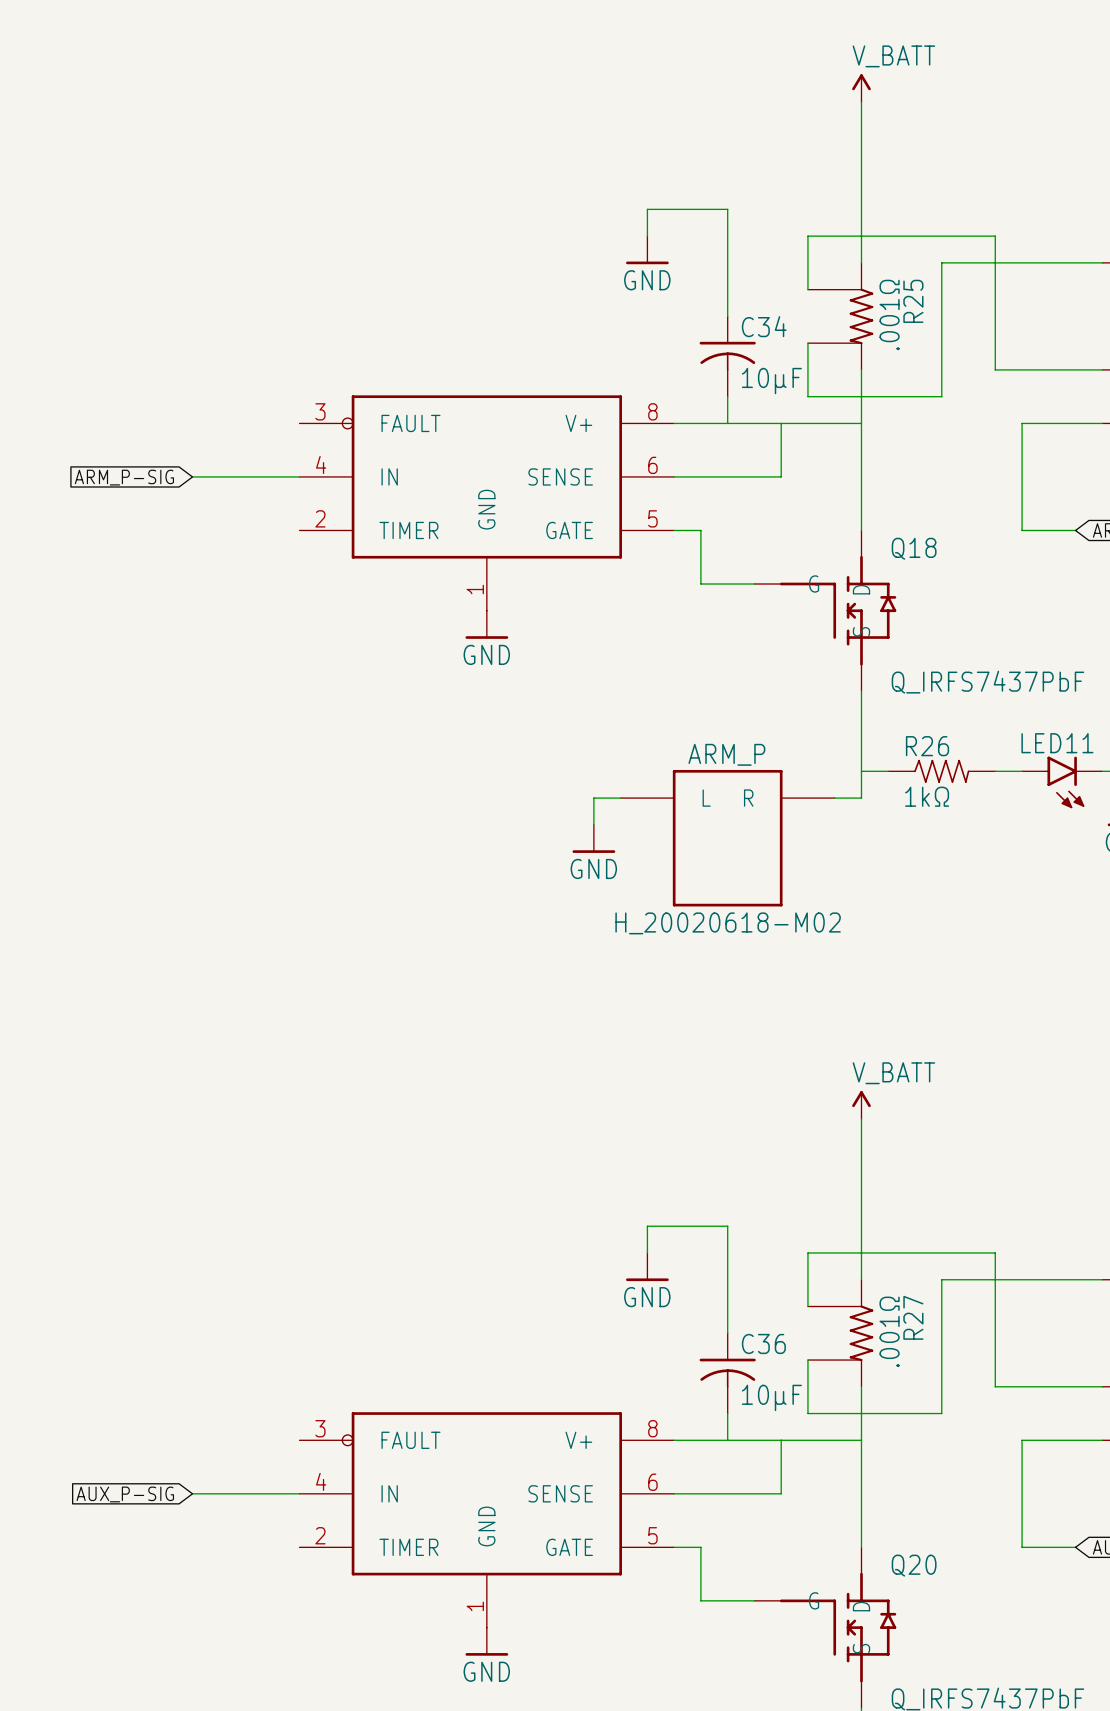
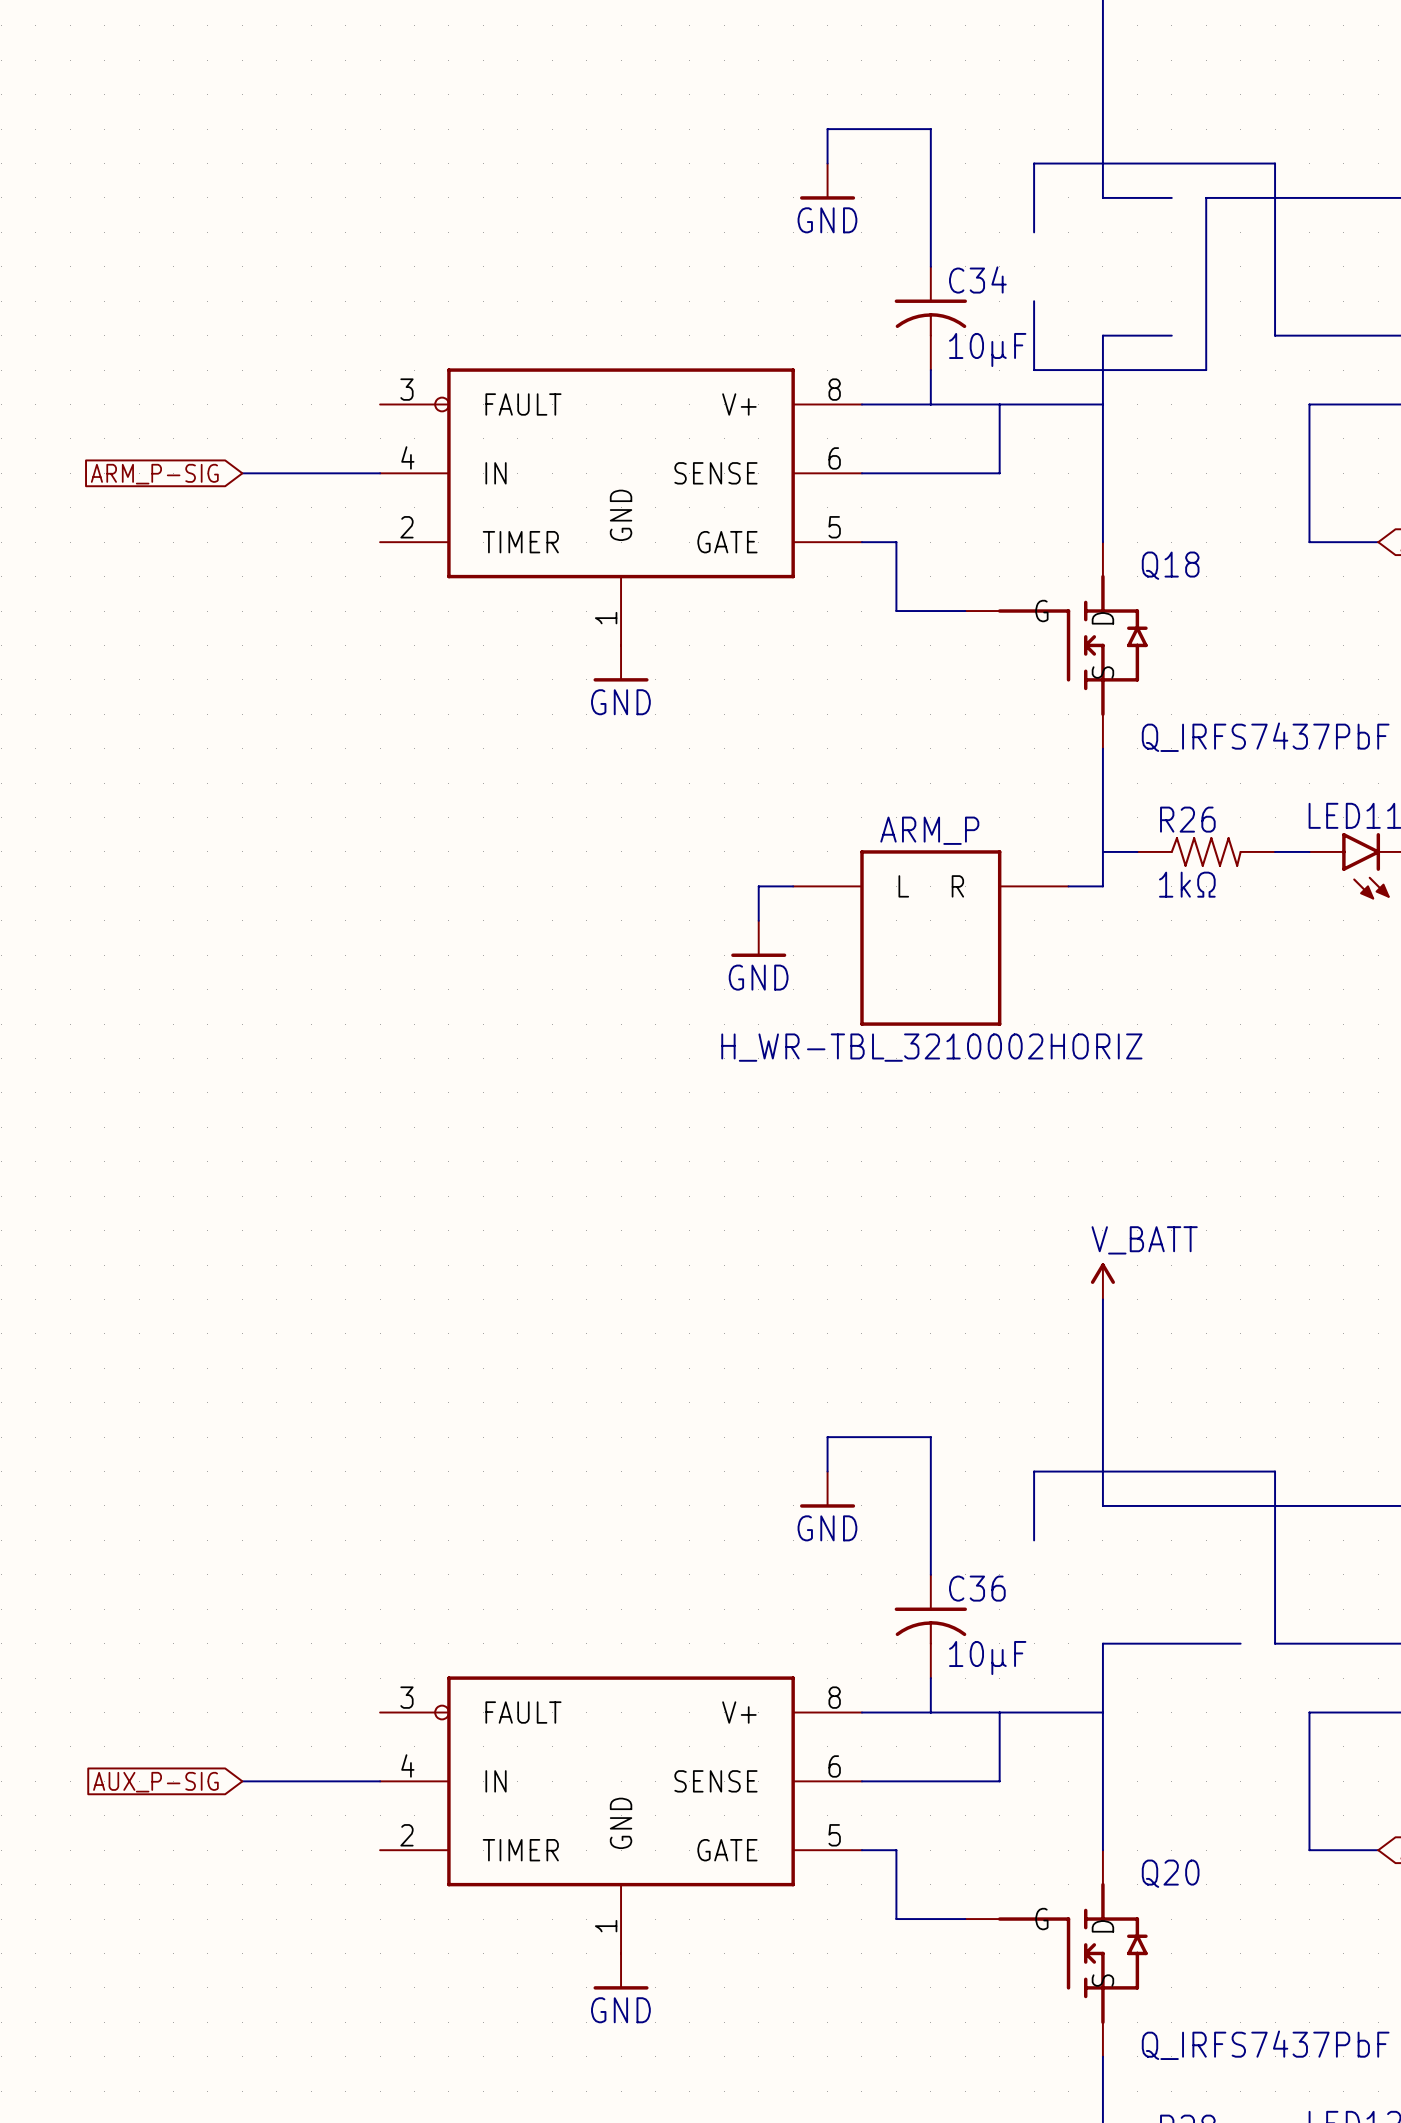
wire: none -> (1102, 197) (1171, 197)
R25: .001Ω (840, 316) -> none
wire: none -> (1102, 335) (1171, 335)
ARM_P value: H_20020618-M02 (728, 923) -> H_WR-TBL_3210002HORIZ (931, 1047)
wire: (941, 1279) (941, 1413) (807, 1413) (807, 1360) -> (1206, 1505) (1102, 1505)
R27: .001Ω (840, 1333) -> none
wire: none -> (1102, 1643) (1240, 1643)

